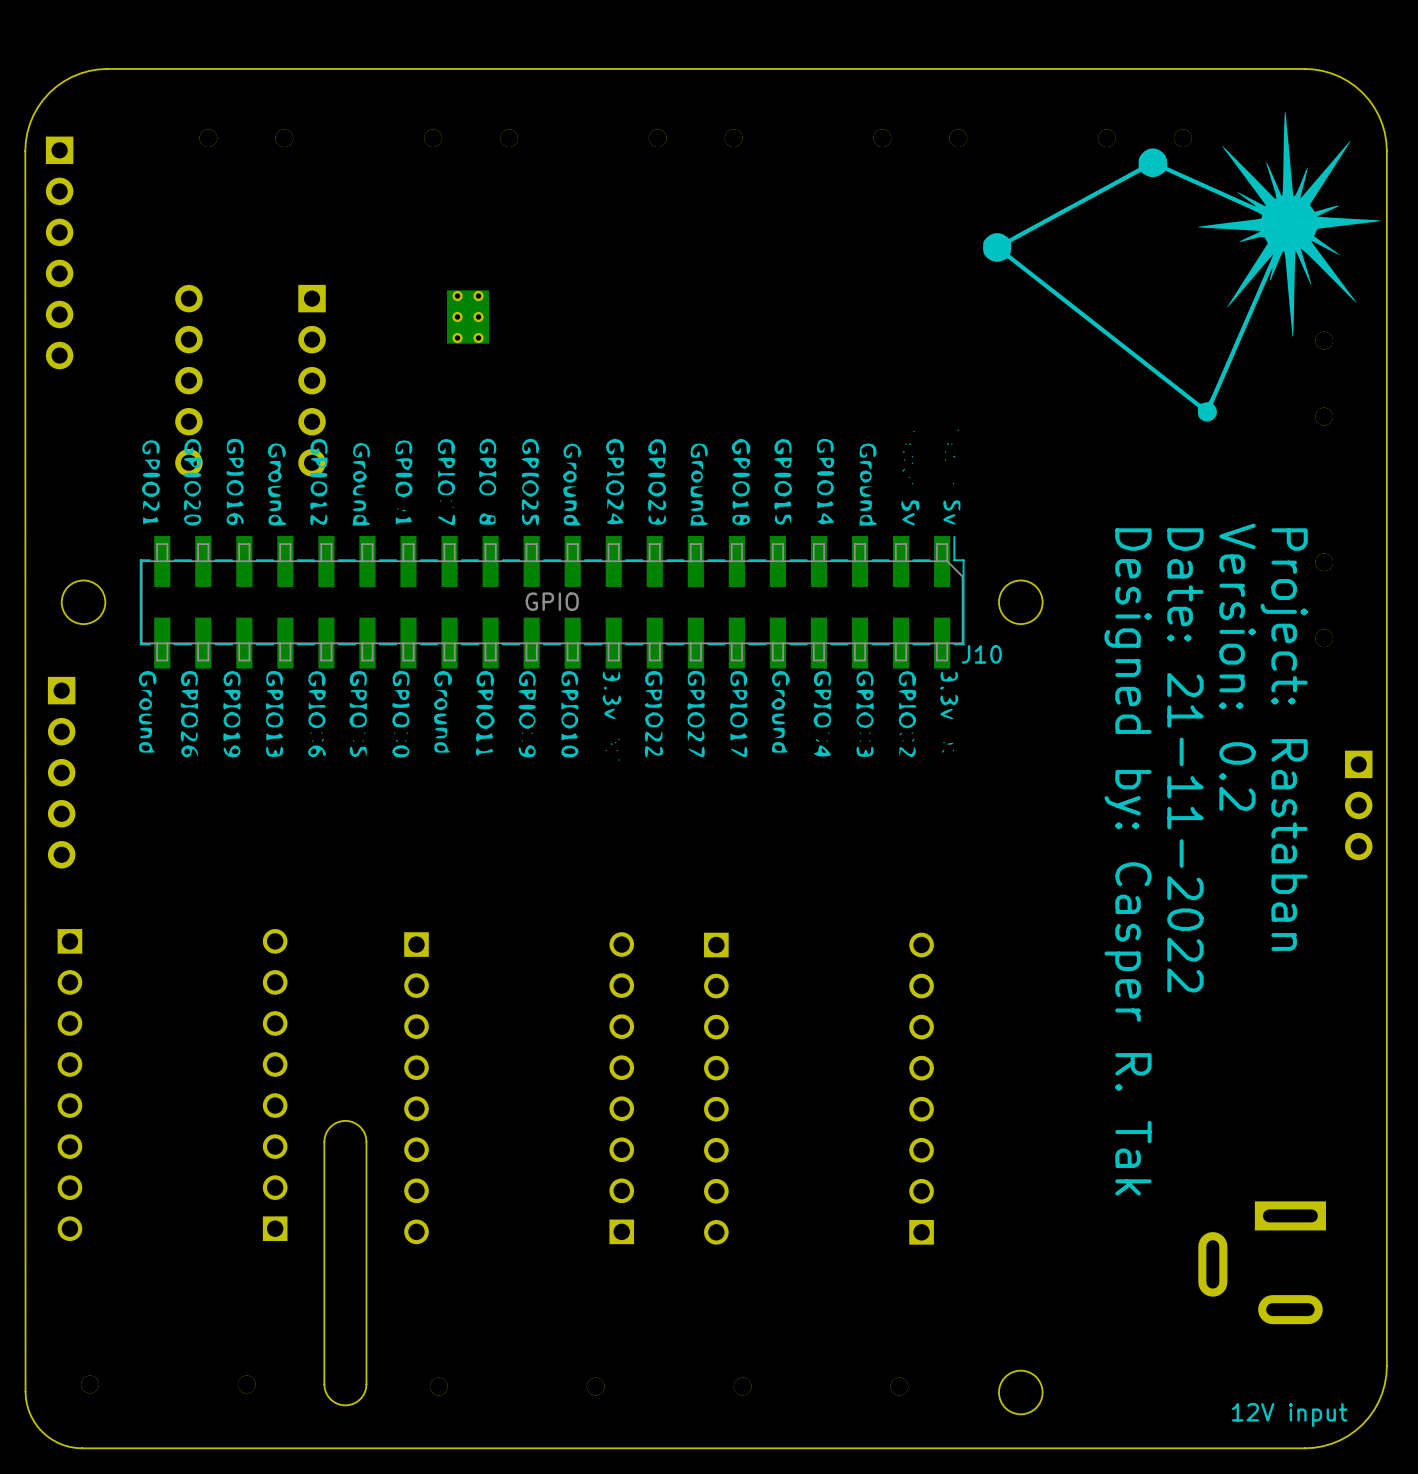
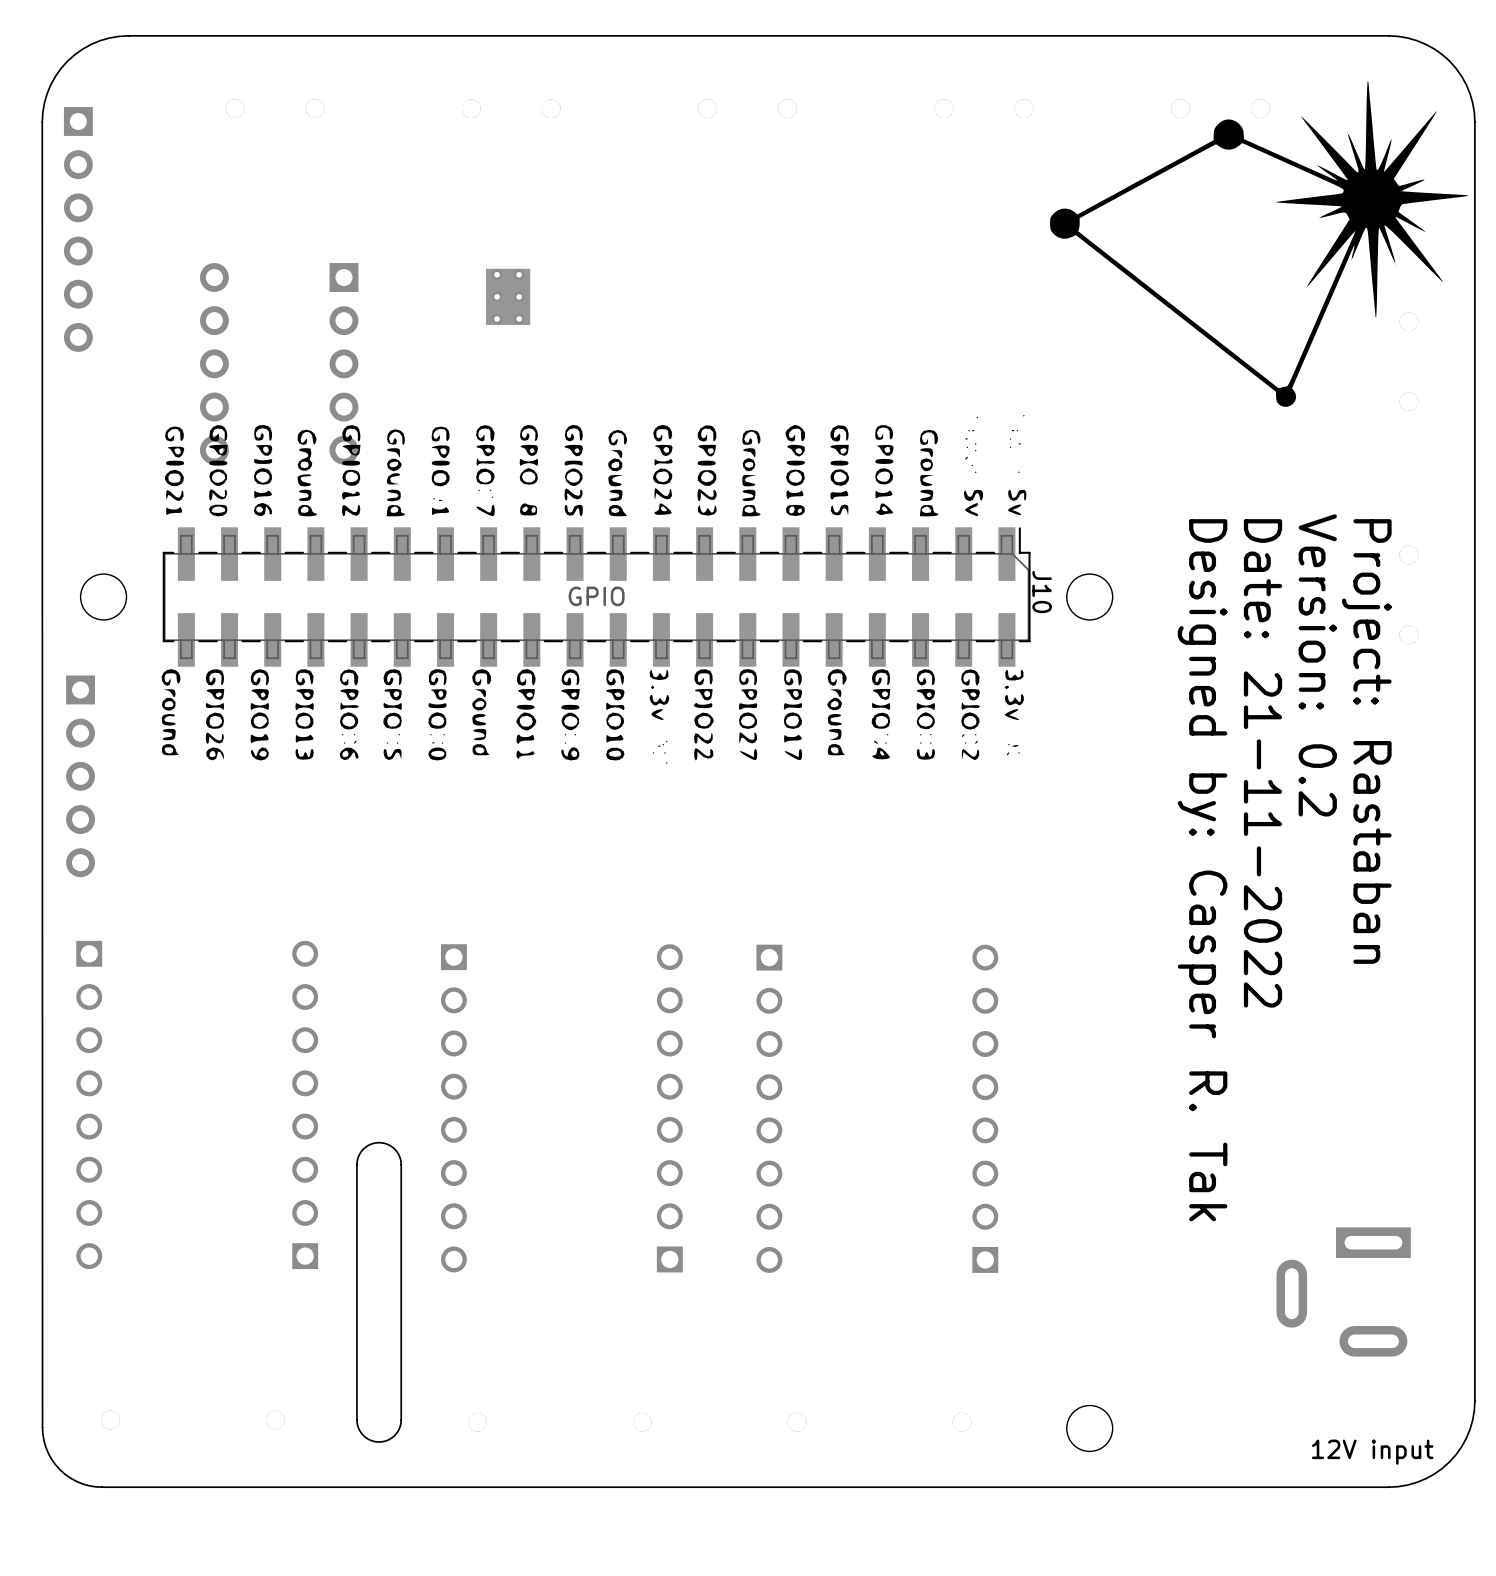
J10 name rotation: 0° (981, 654) -> 90° clockwise (1042, 592)
J10 name position: J10 (981, 654) -> J10 (1042, 592)
part: (1358, 805) -> none

